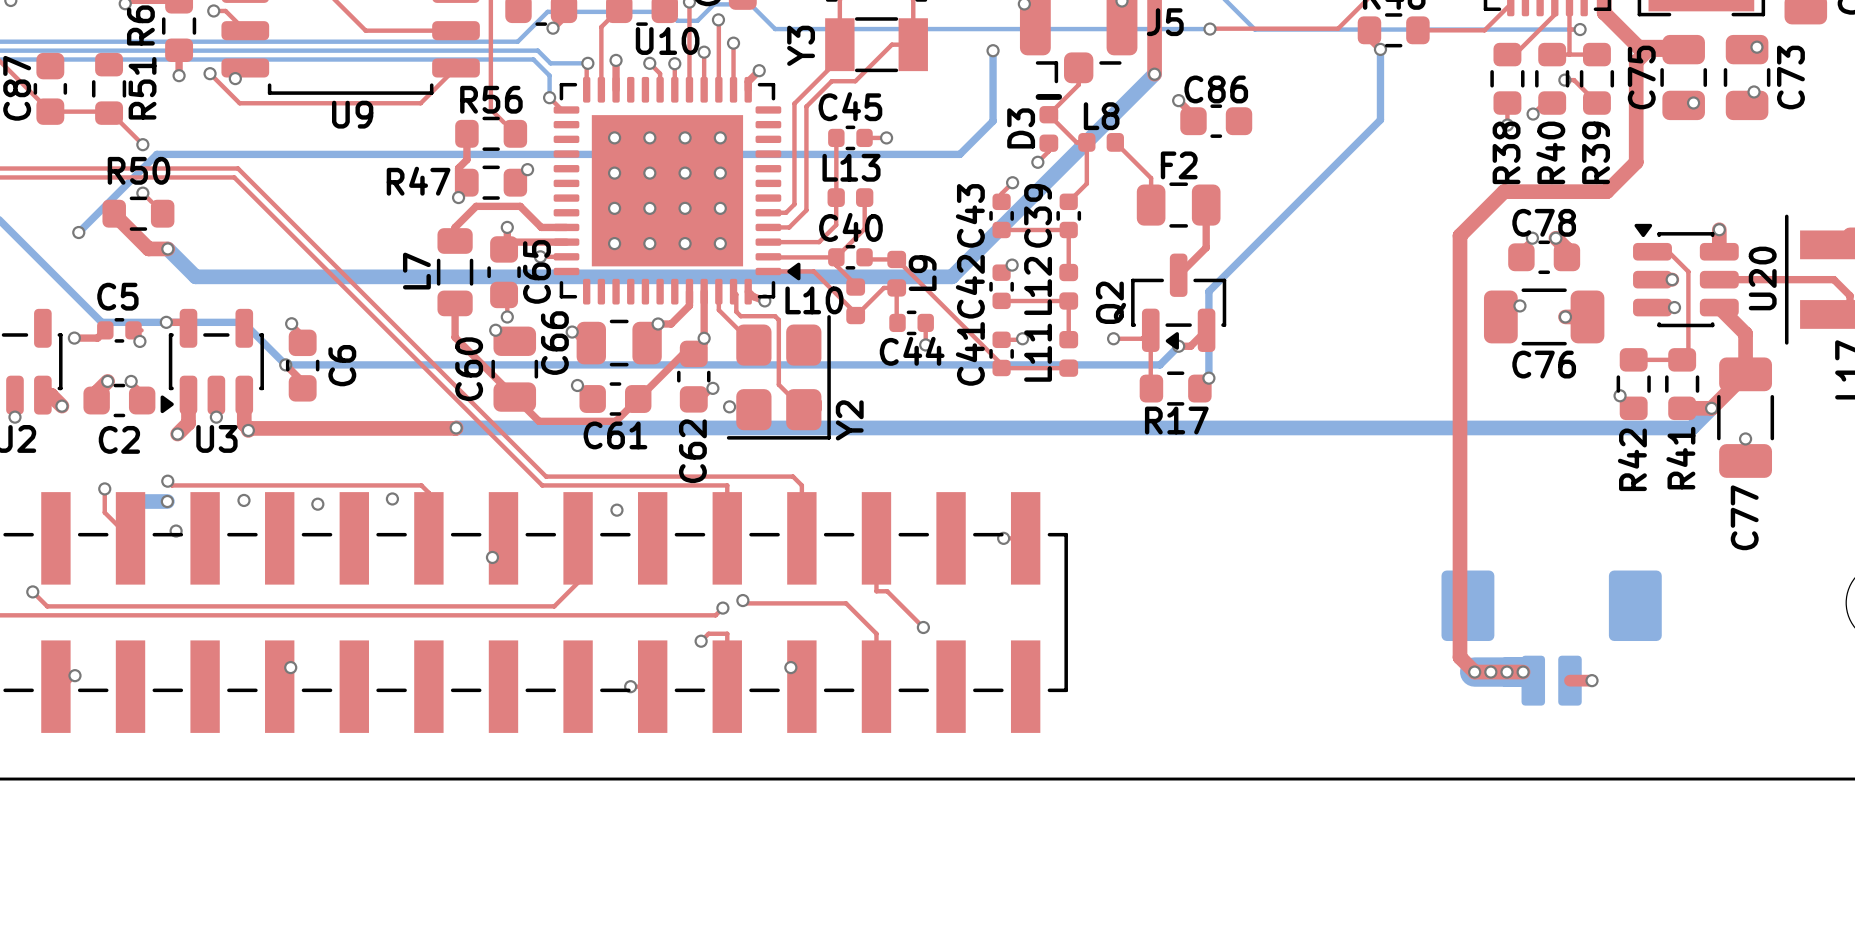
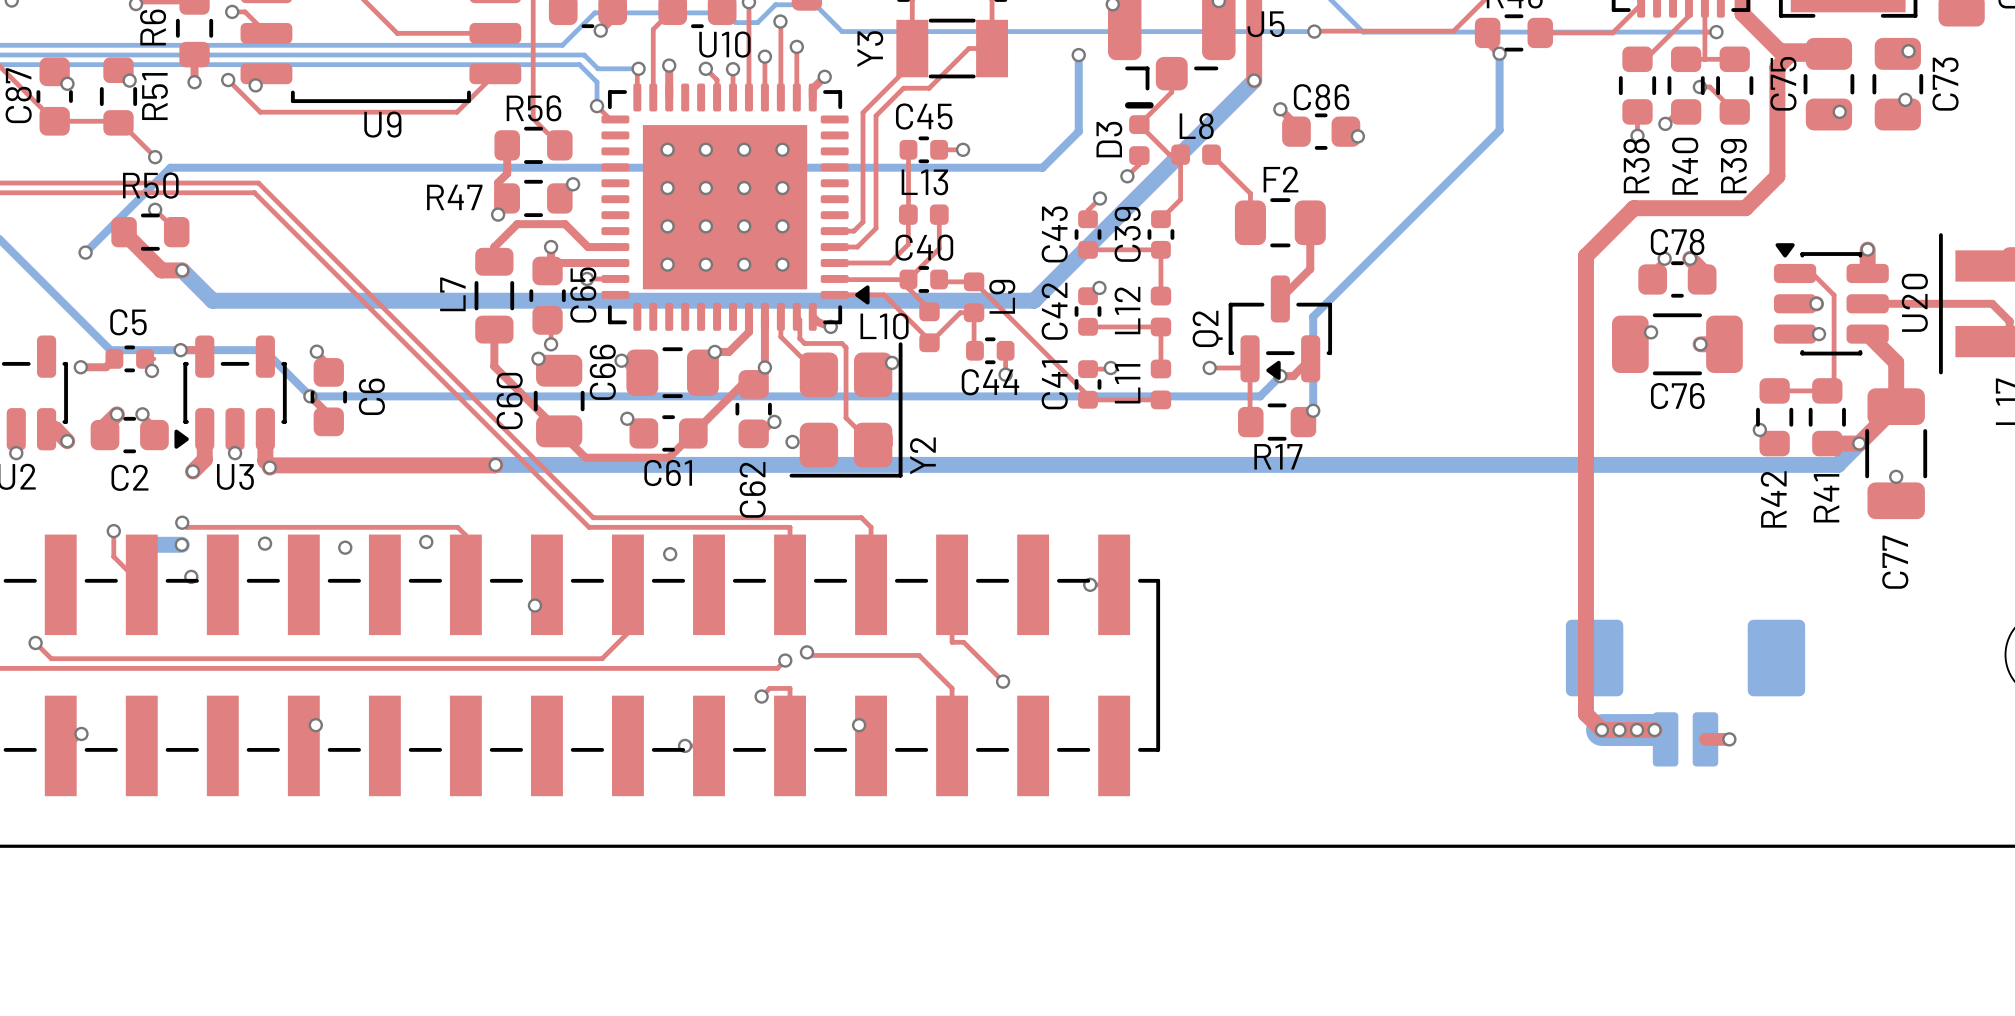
via: none -> (129, 80)
via: none -> (67, 83)
via: none -> (1357, 136)
via: none -> (892, 362)

